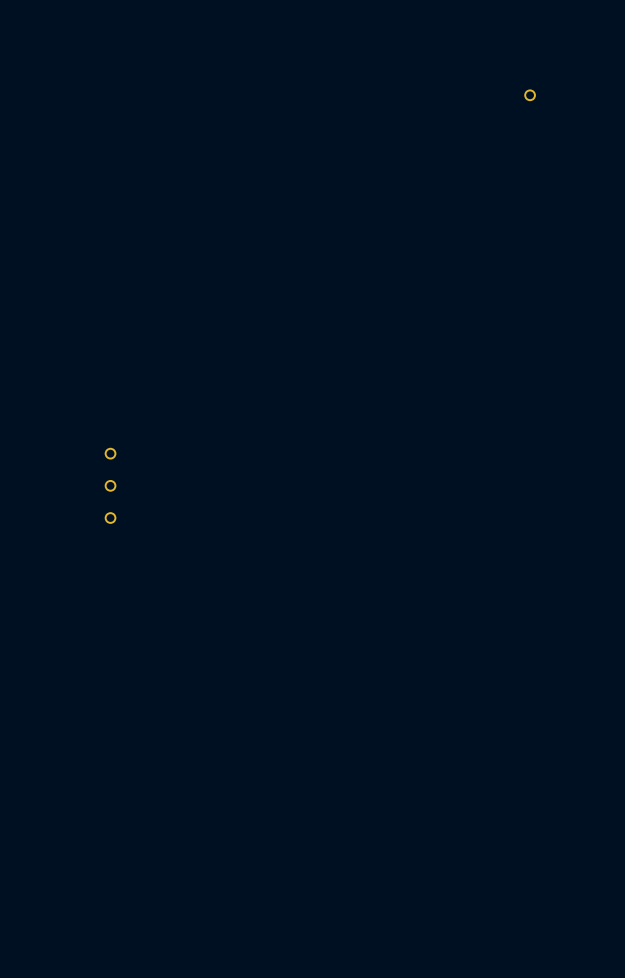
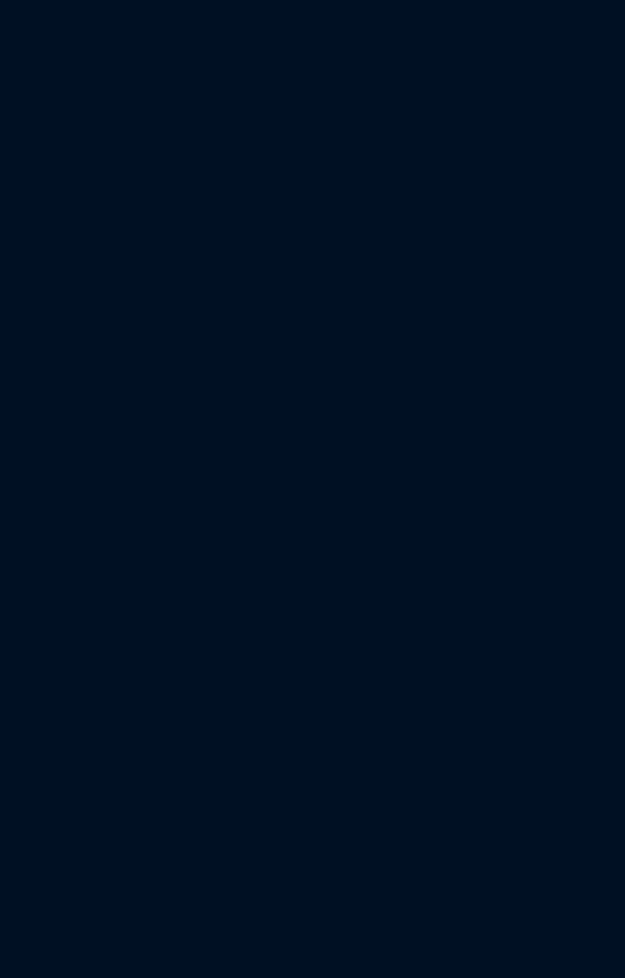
part: (530, 95) -> none
part: (110, 453) -> none
part: (110, 485) -> none
part: (110, 518) -> none

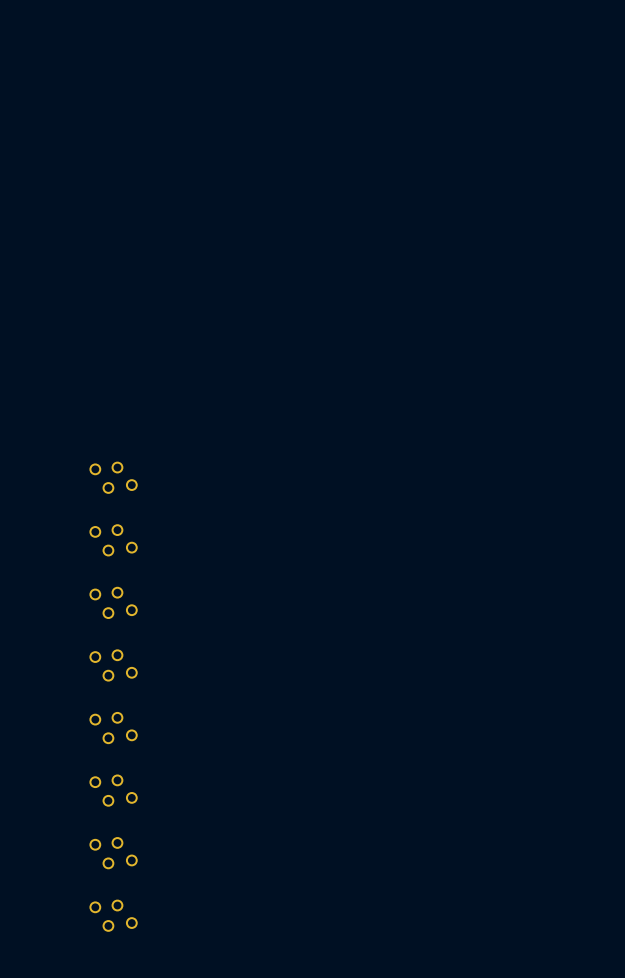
part: none -> (113, 477)
part: none -> (113, 540)
part: none -> (113, 602)
part: none -> (113, 665)
part: none -> (113, 728)
part: none -> (113, 790)
part: none -> (113, 853)
part: none -> (113, 915)

